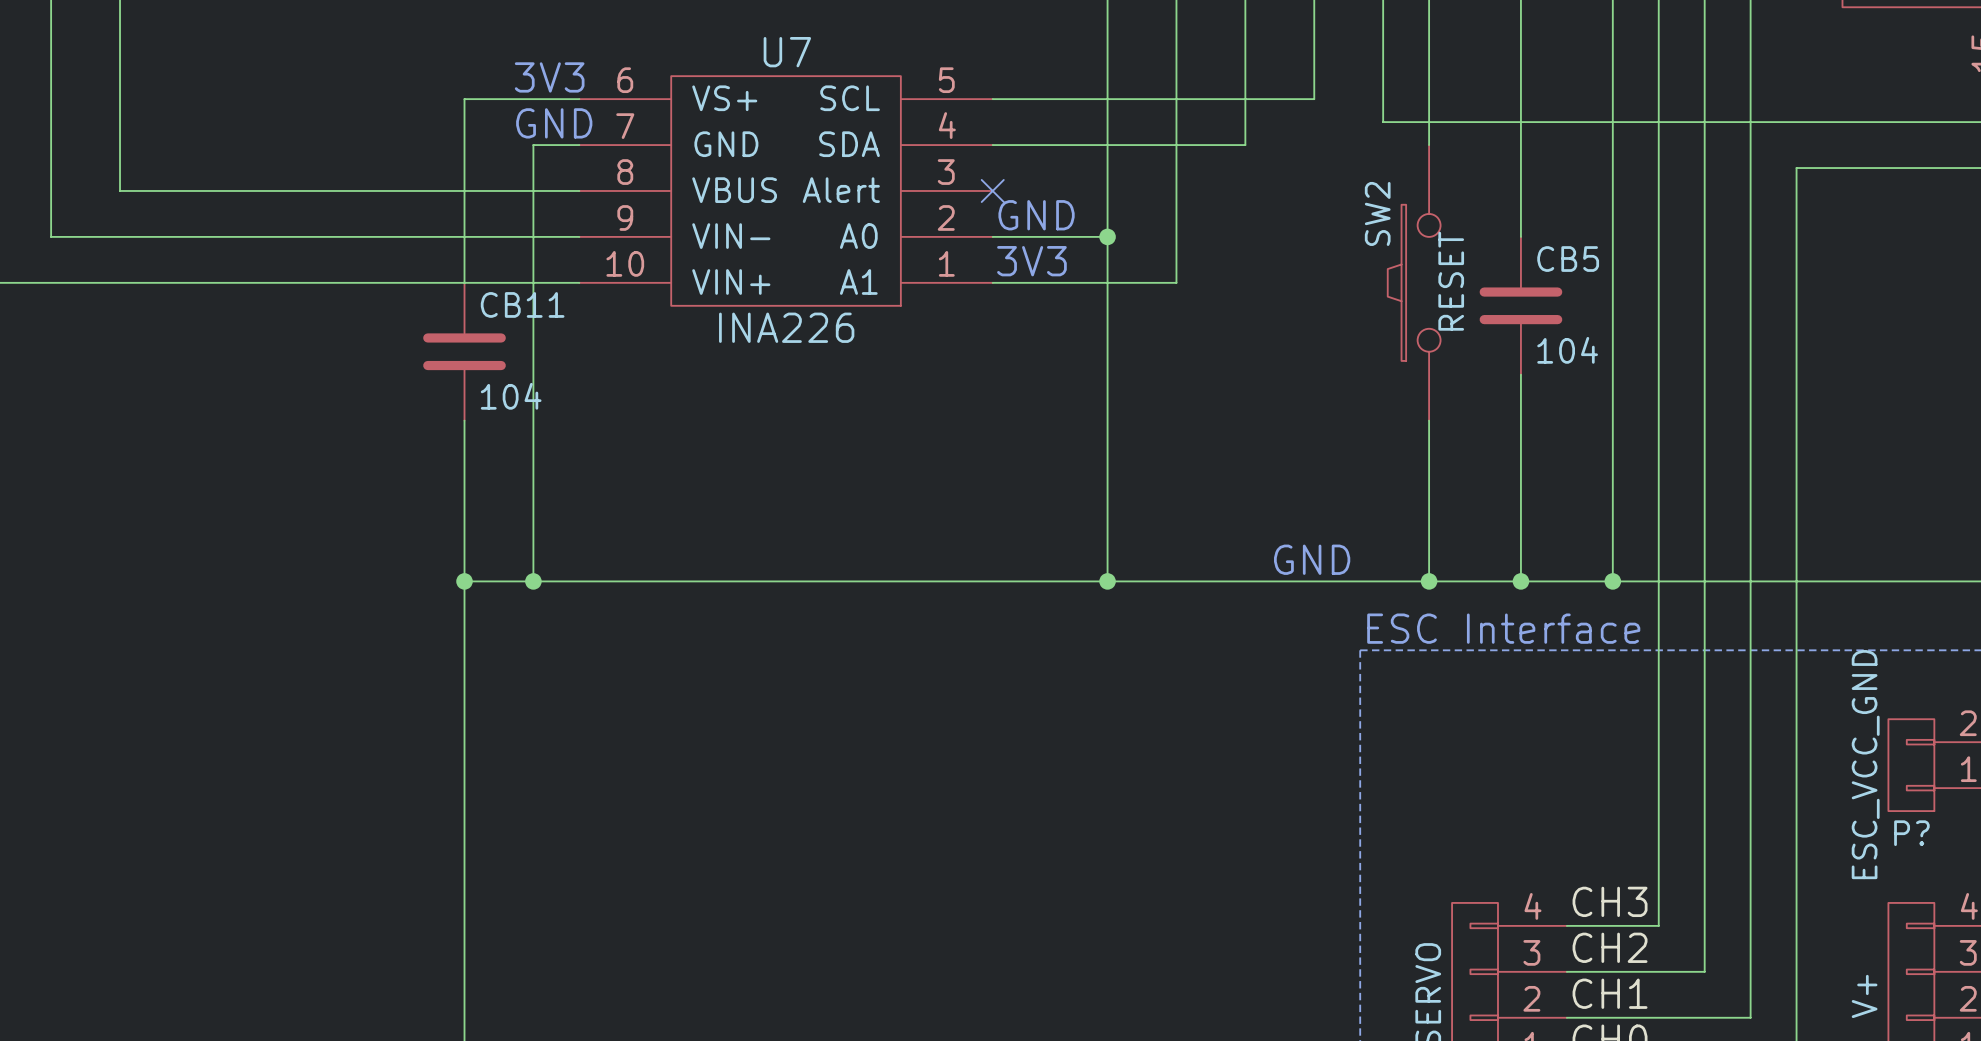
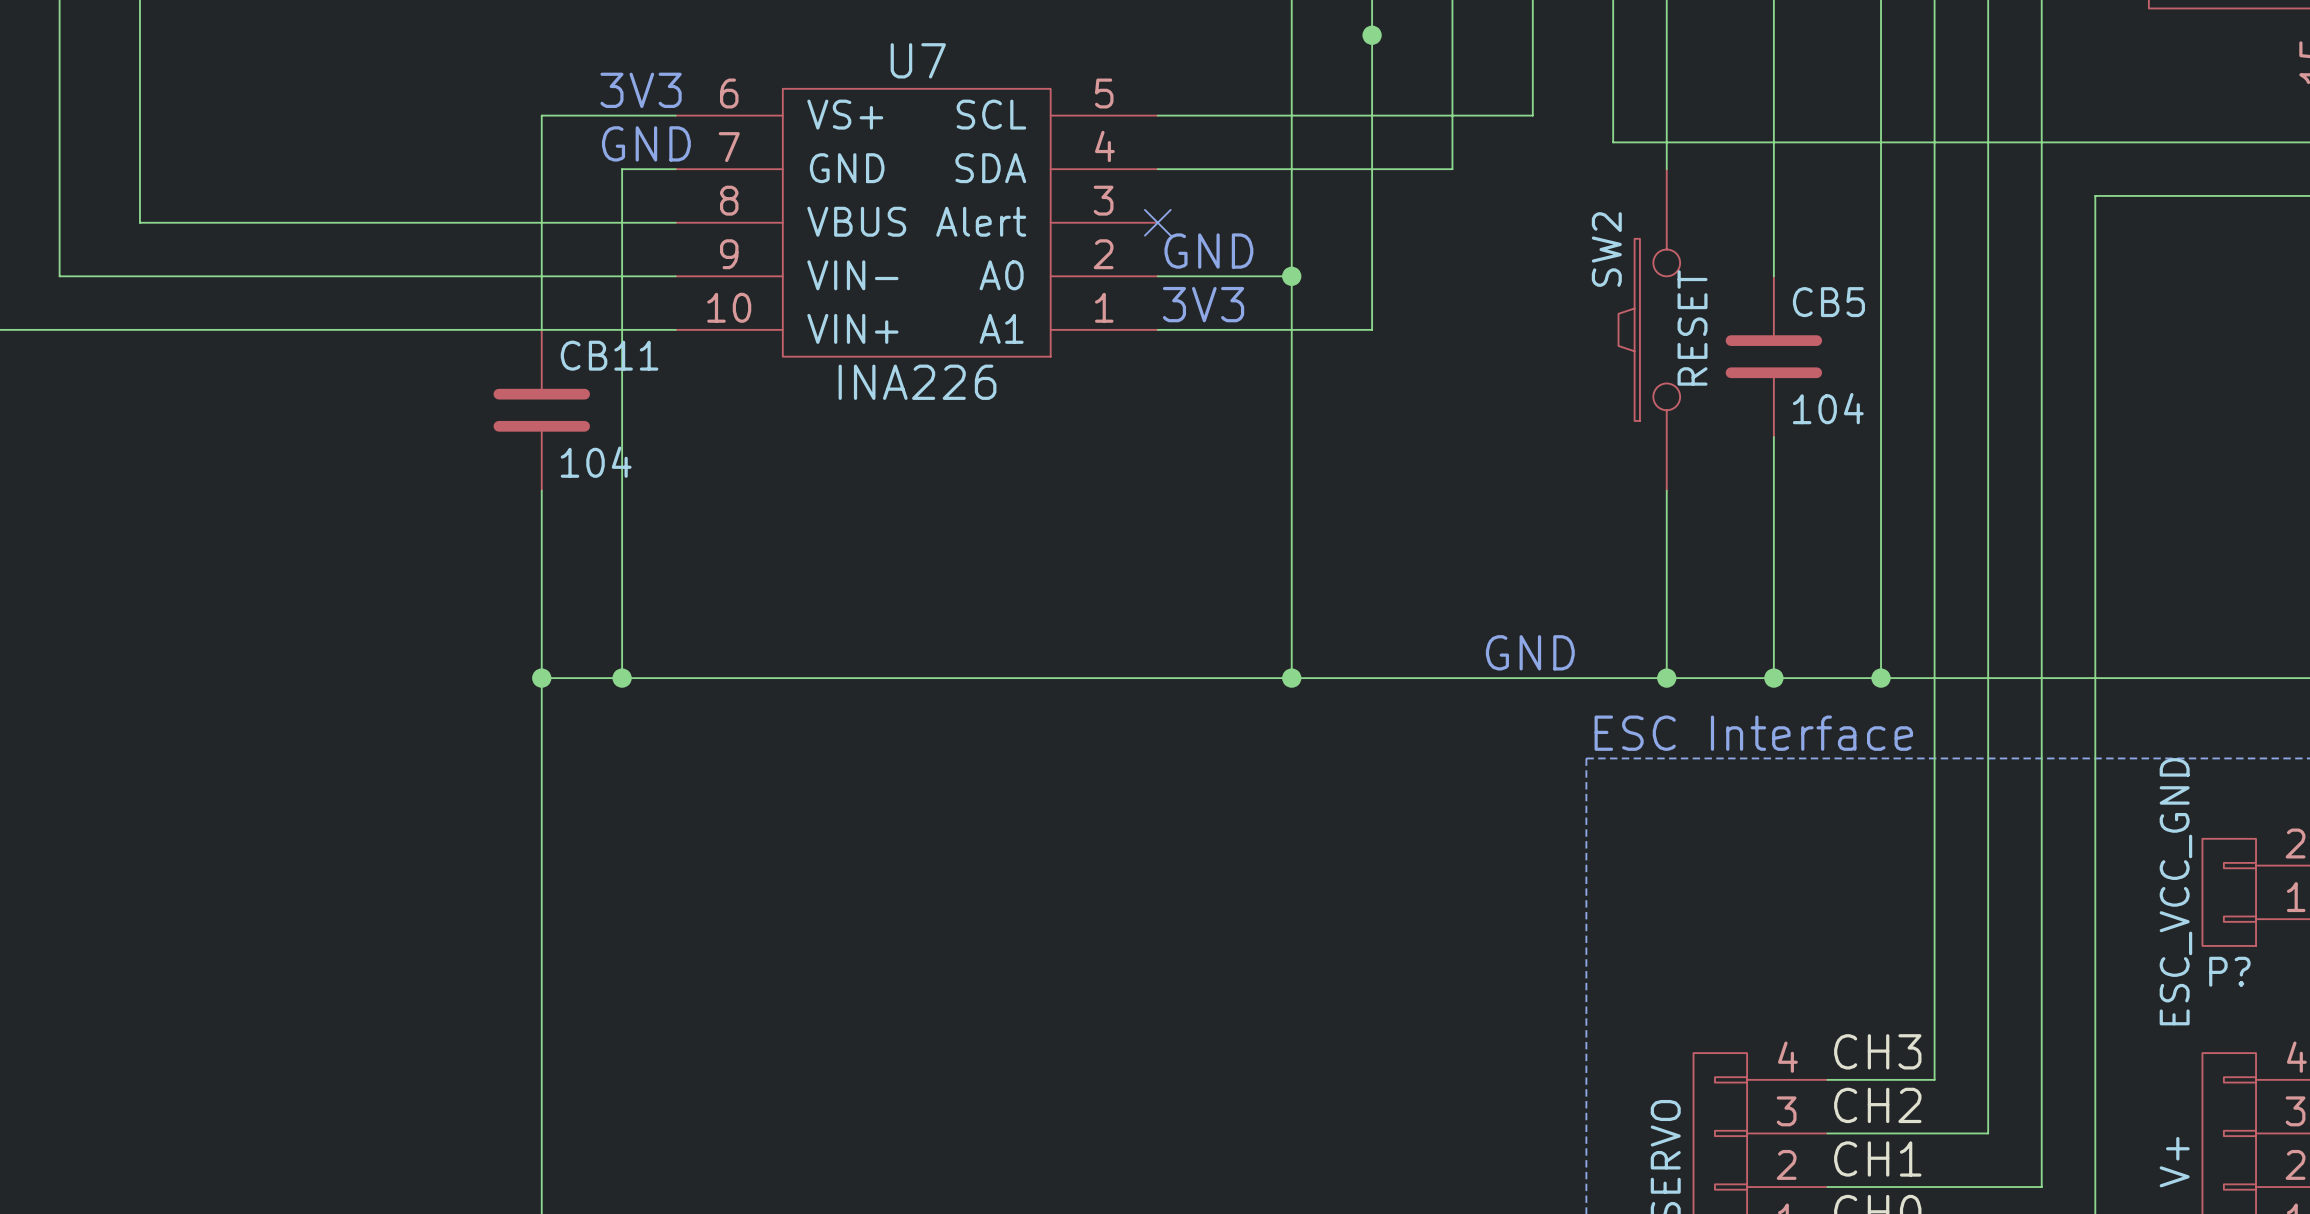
junction: none -> (1372, 35)

